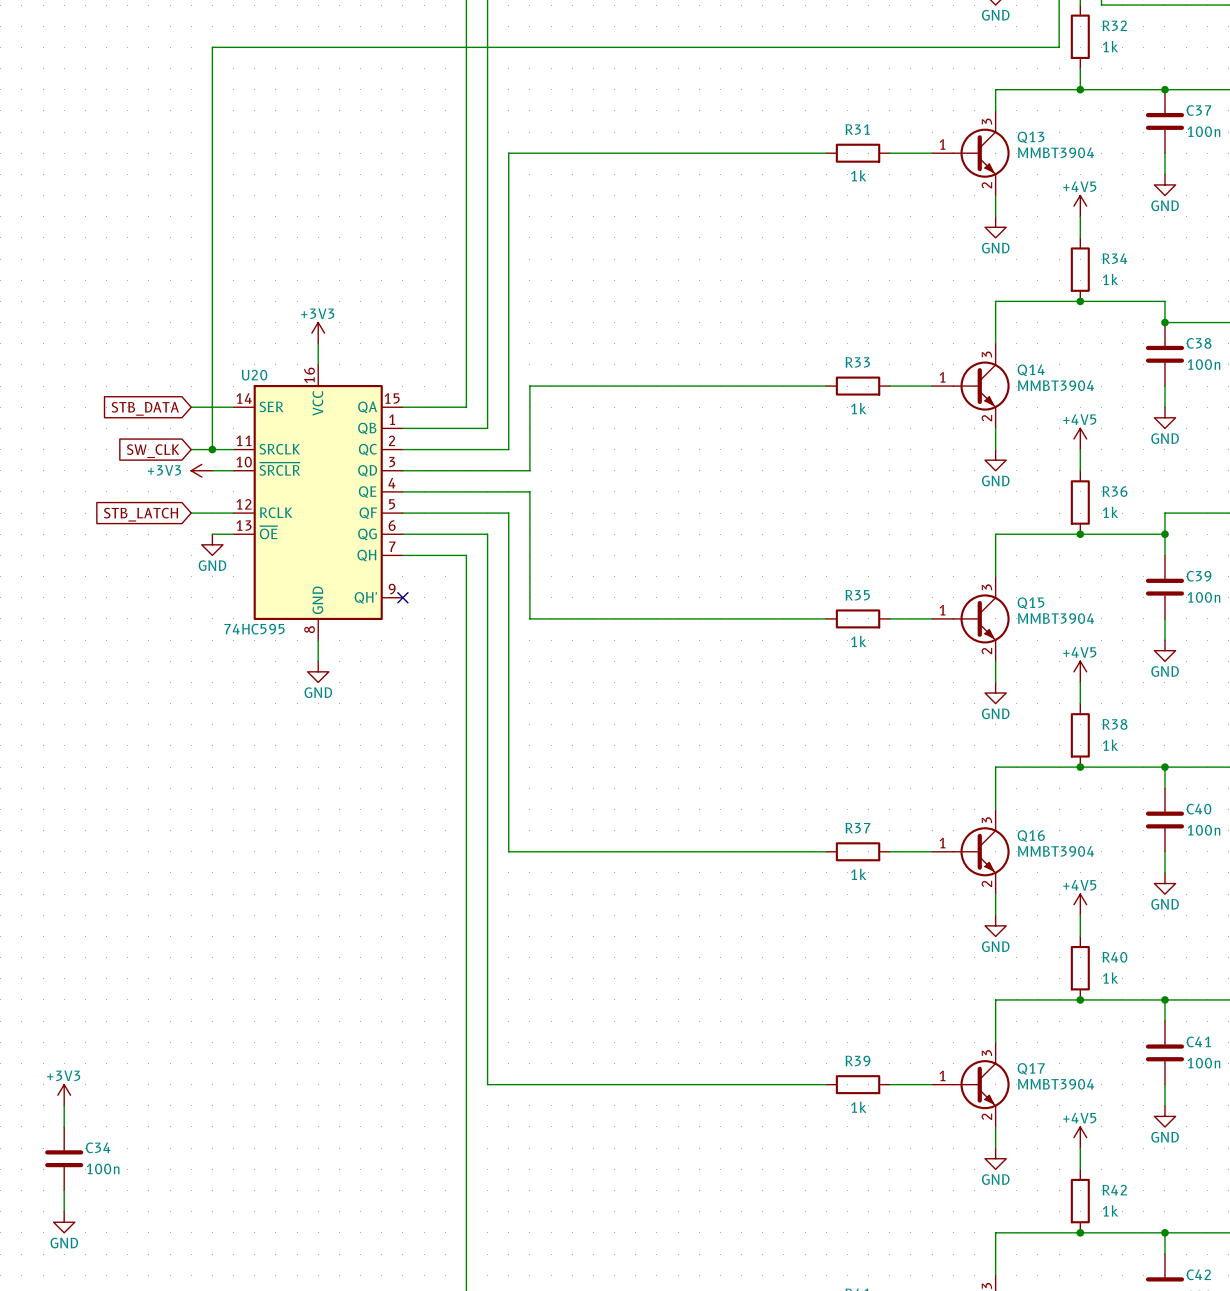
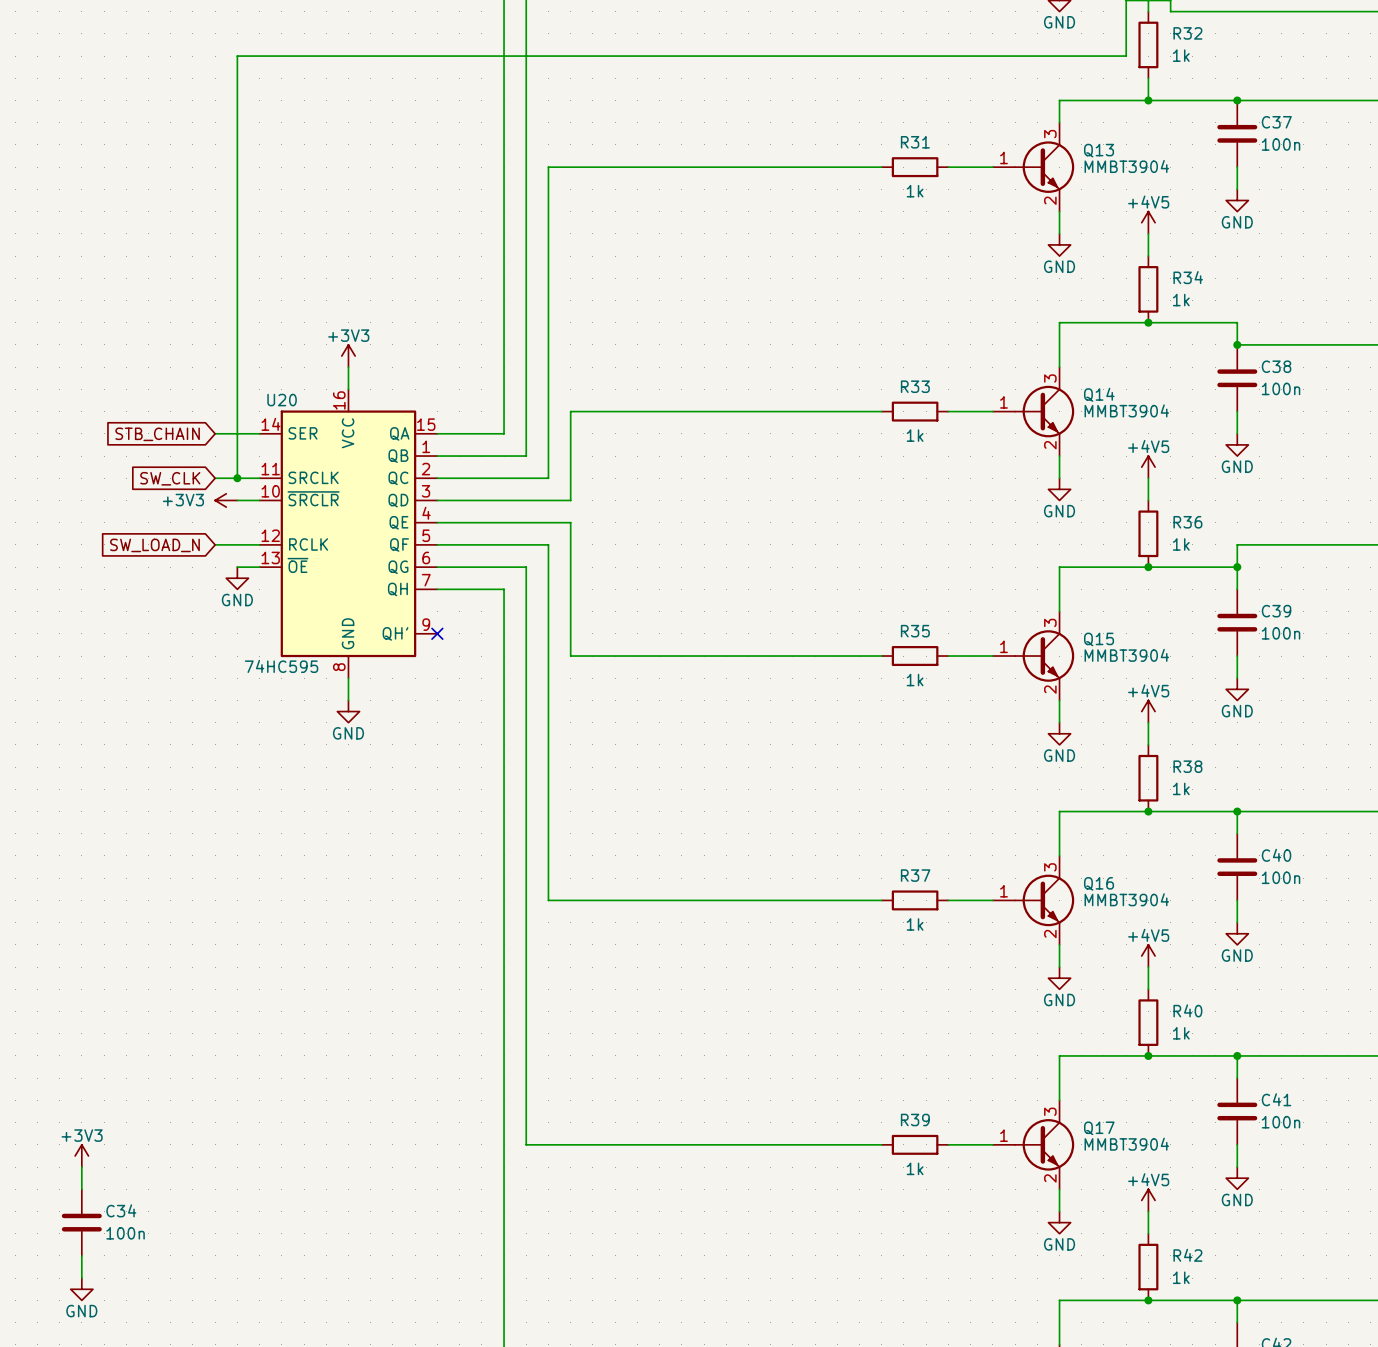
global label: STB_DATA (145, 408) -> STB_CHAIN (157, 434)
global label: STB_LATCH (141, 514) -> SW_LOAD_N (154, 545)

